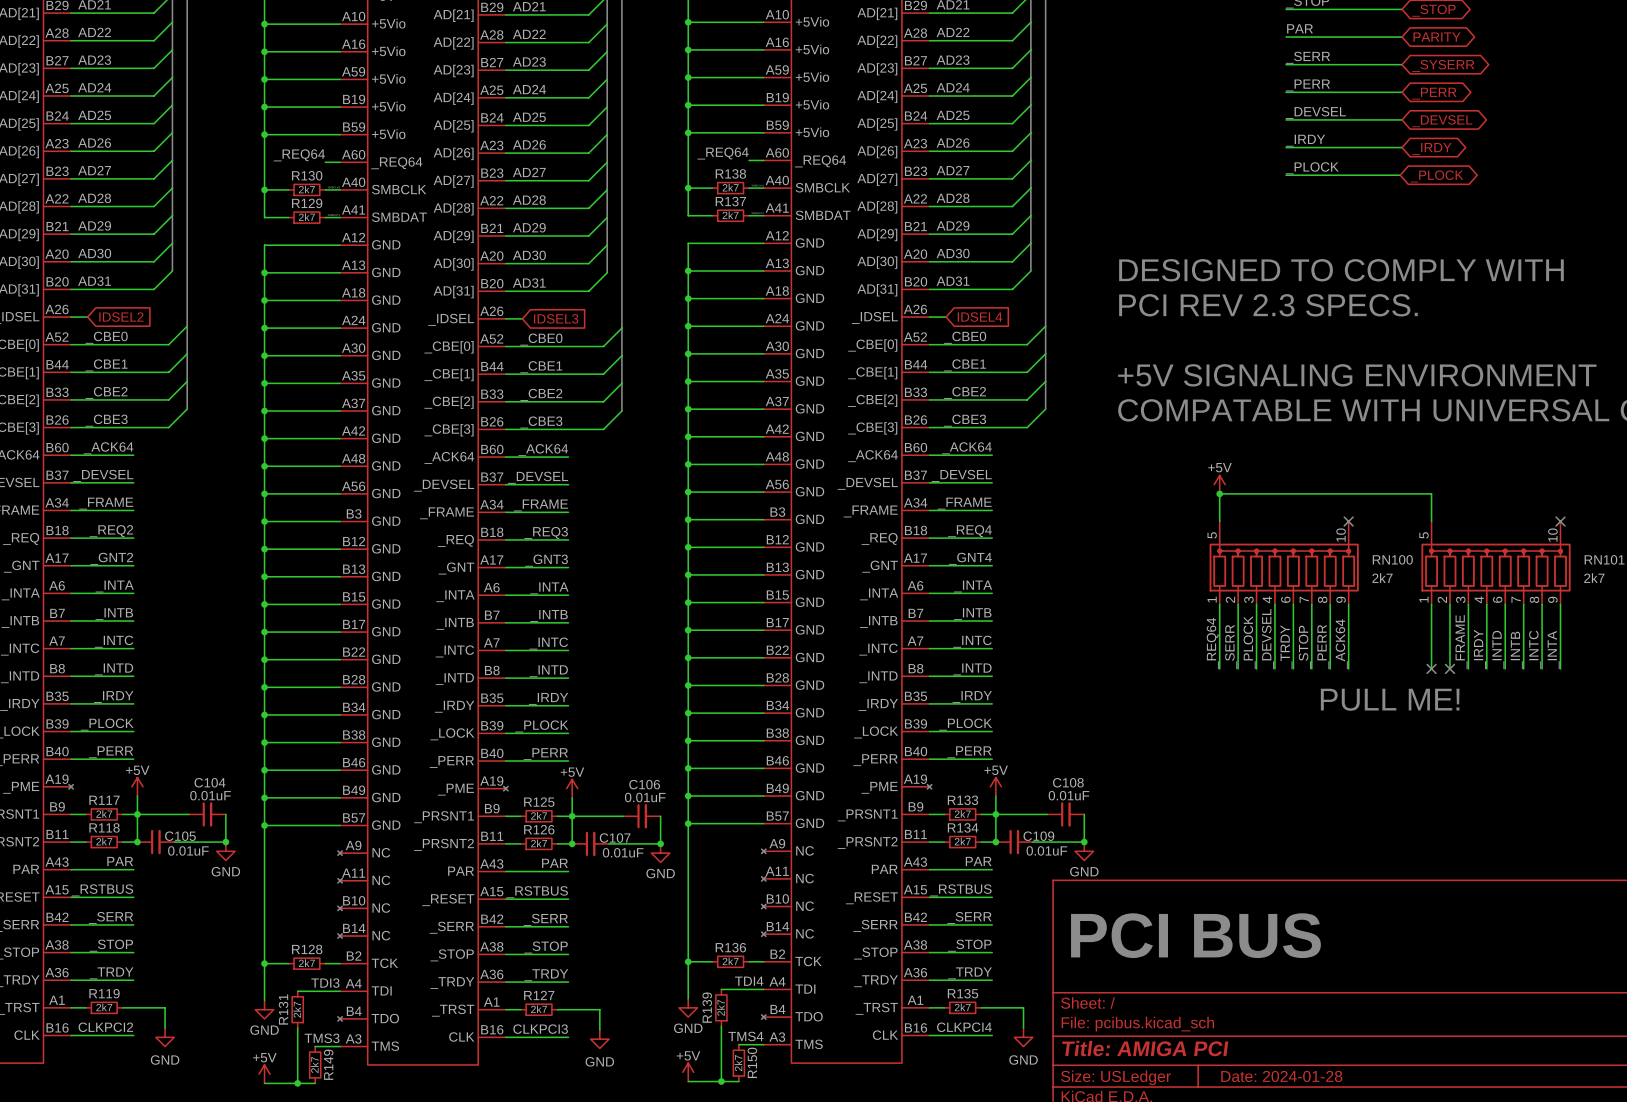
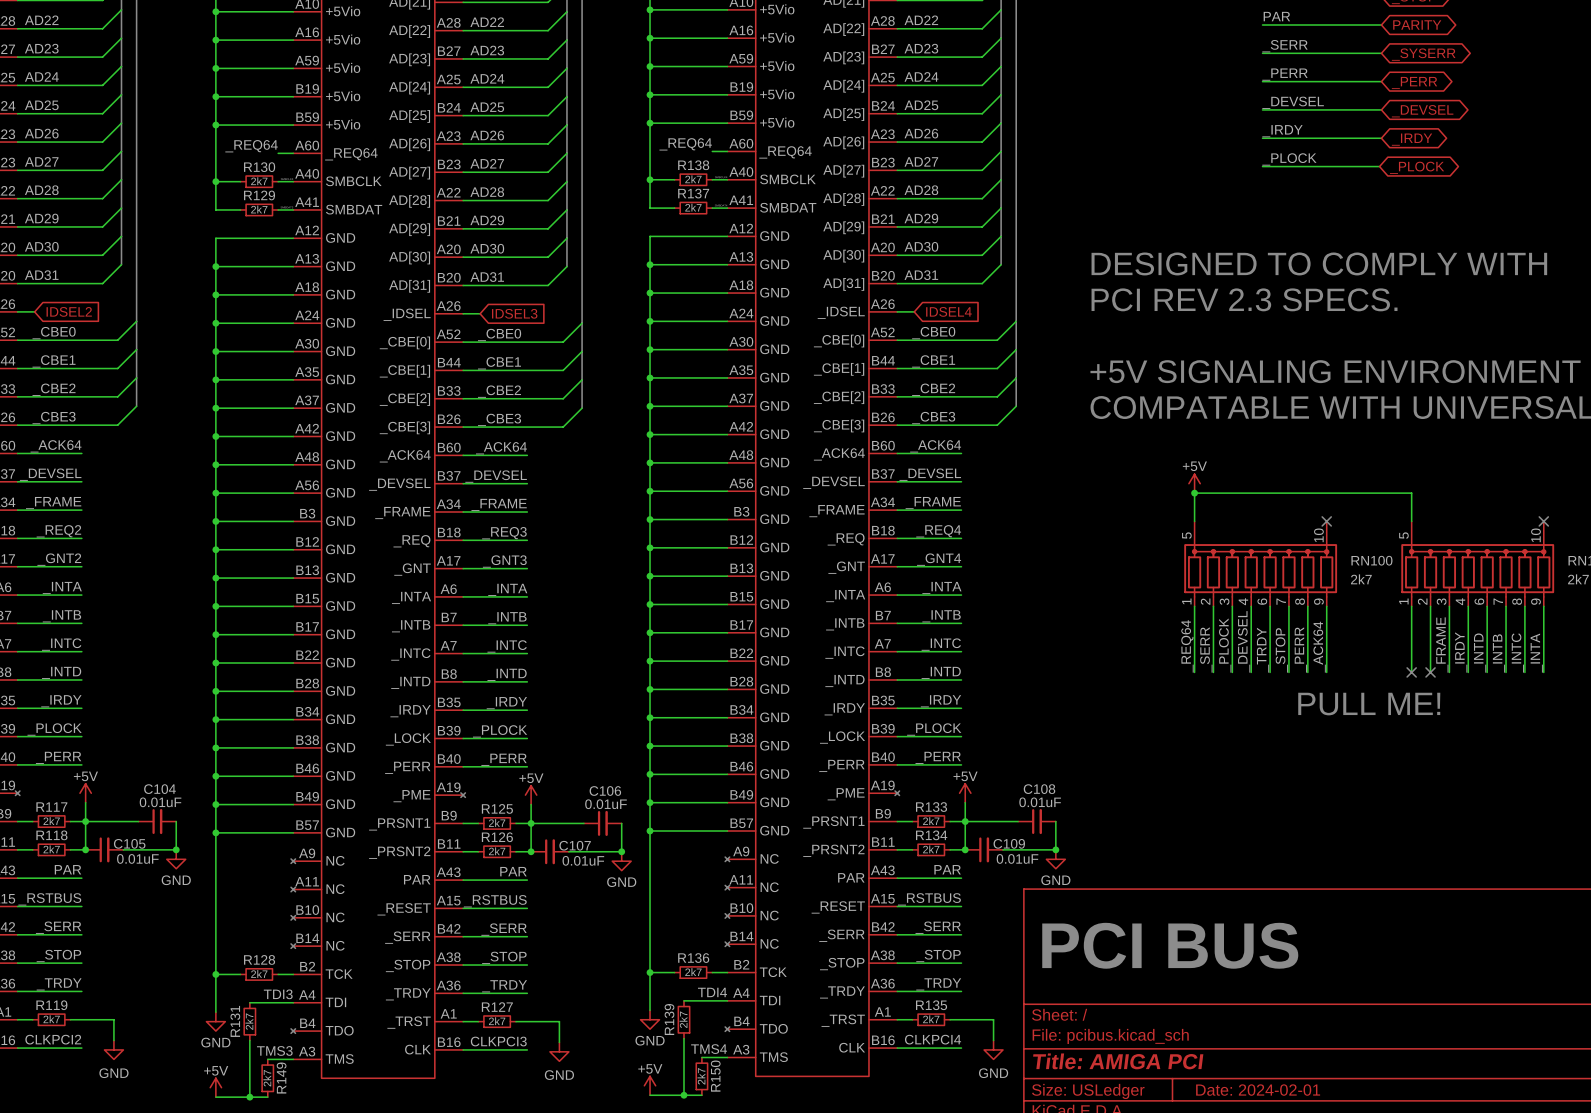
title block: Date: 2024-01-28 (1281, 1076) -> Date: 2024-02-01 (1258, 1090)

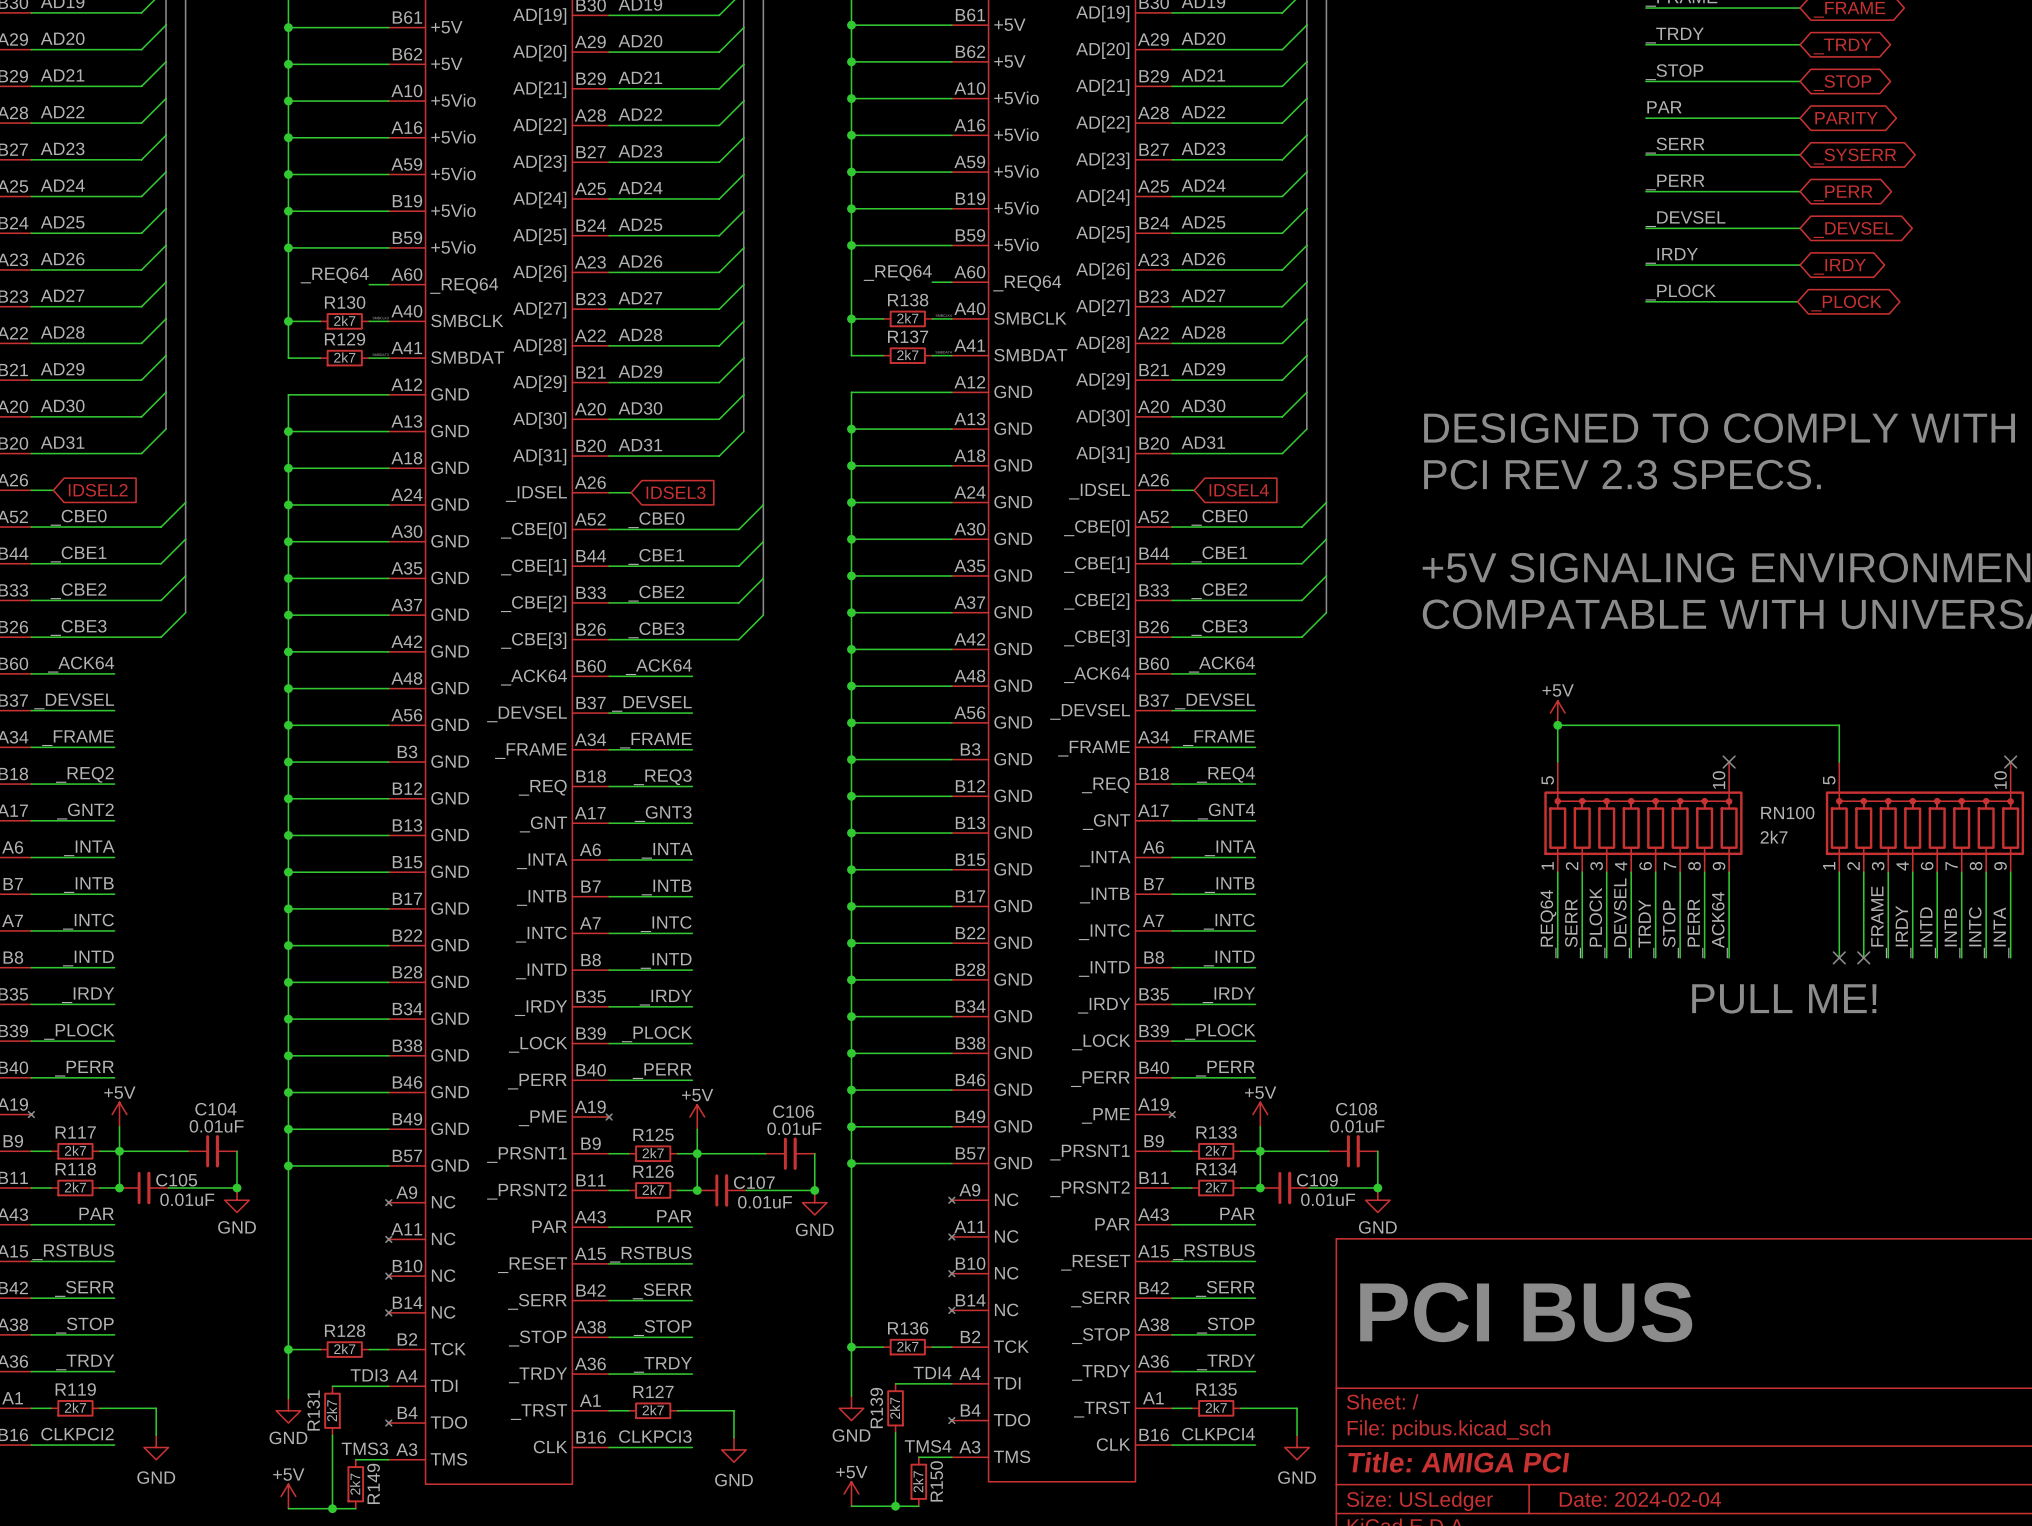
title block: Date: 2024-02-01 (1258, 1090) -> Date: 2024-02-04 (1640, 1499)

